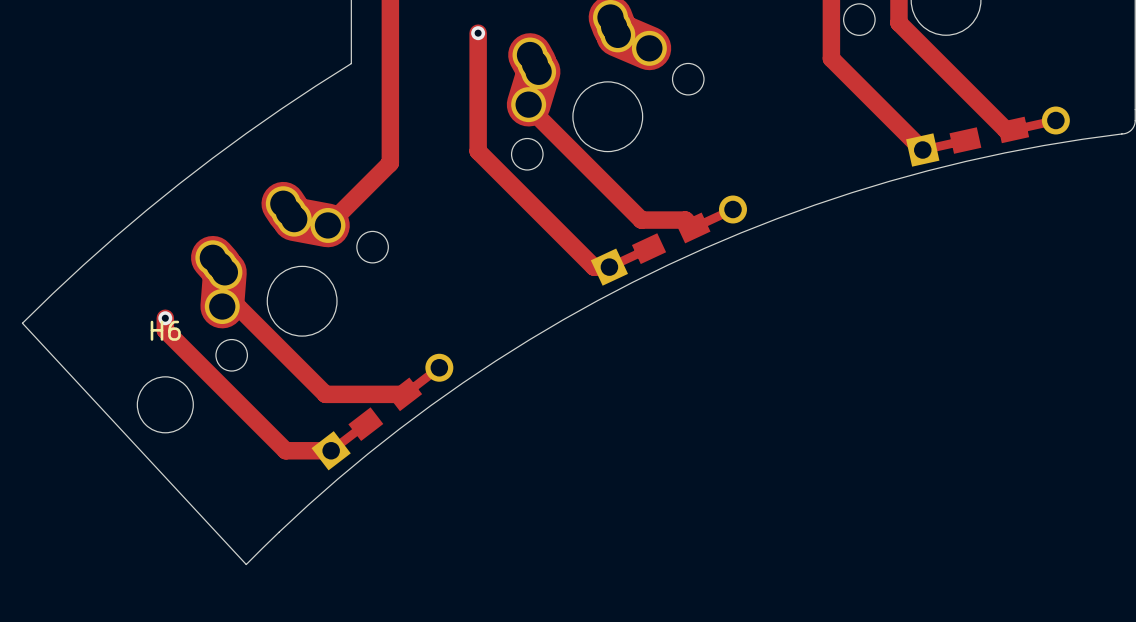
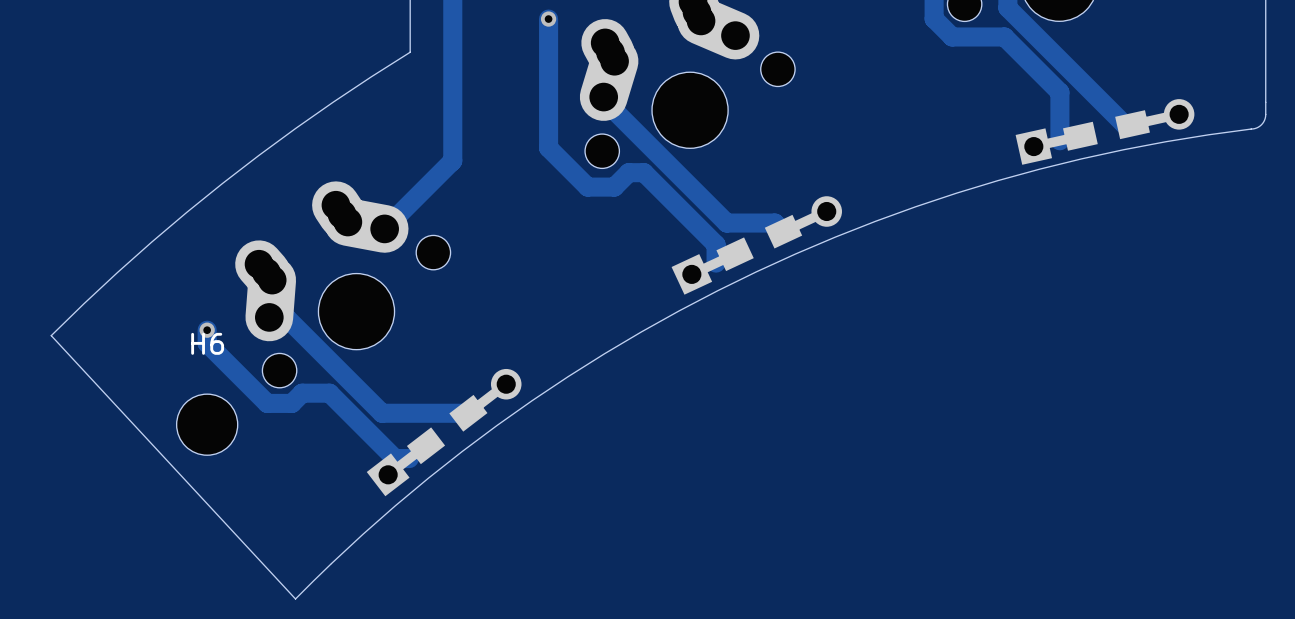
track: (831, 33) (831, 58) (922, 150) -> (934, 18) (952, 36) (1004, 36) (1059, 92) (1059, 140)
track: (514, 187) (593, 267) (609, 267) -> (587, 187) (614, 187) (628, 172) (644, 172) (716, 244) (716, 263)
track: (220, 385) (285, 450) (331, 450) -> (267, 403) (291, 403) (302, 393) (329, 393) (394, 458) (409, 458)

